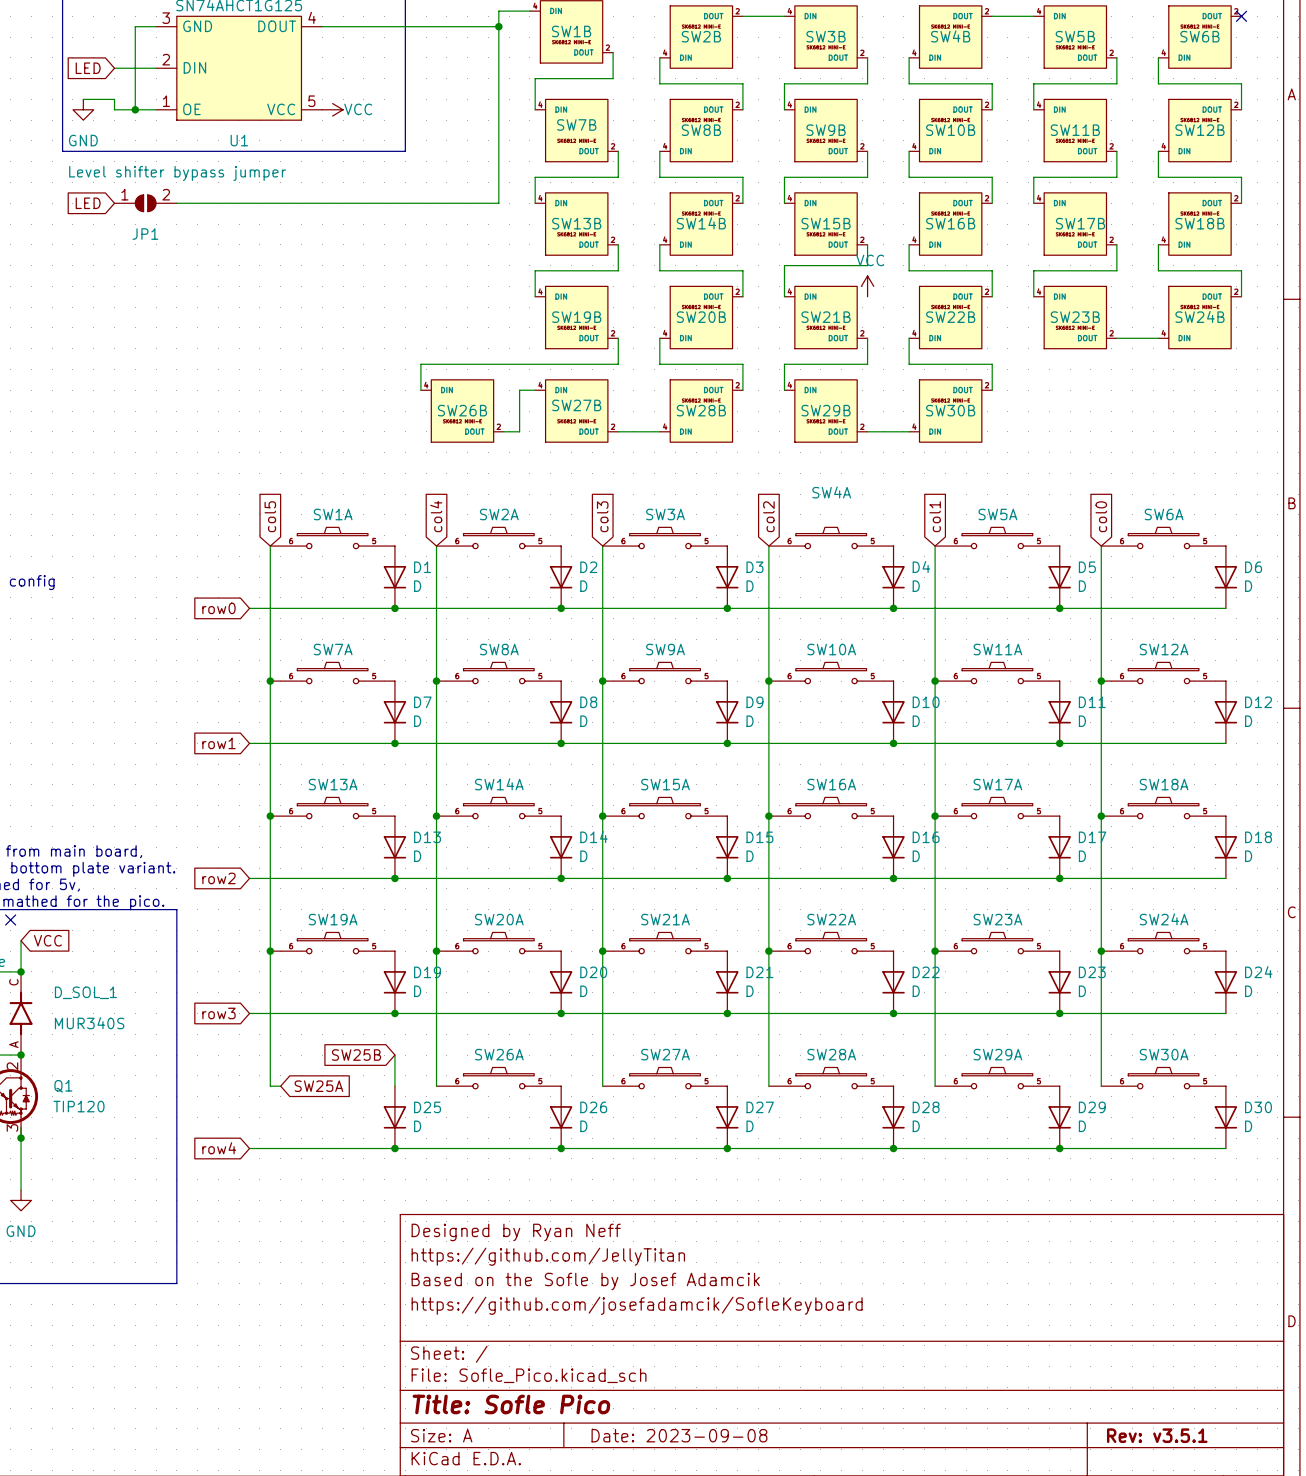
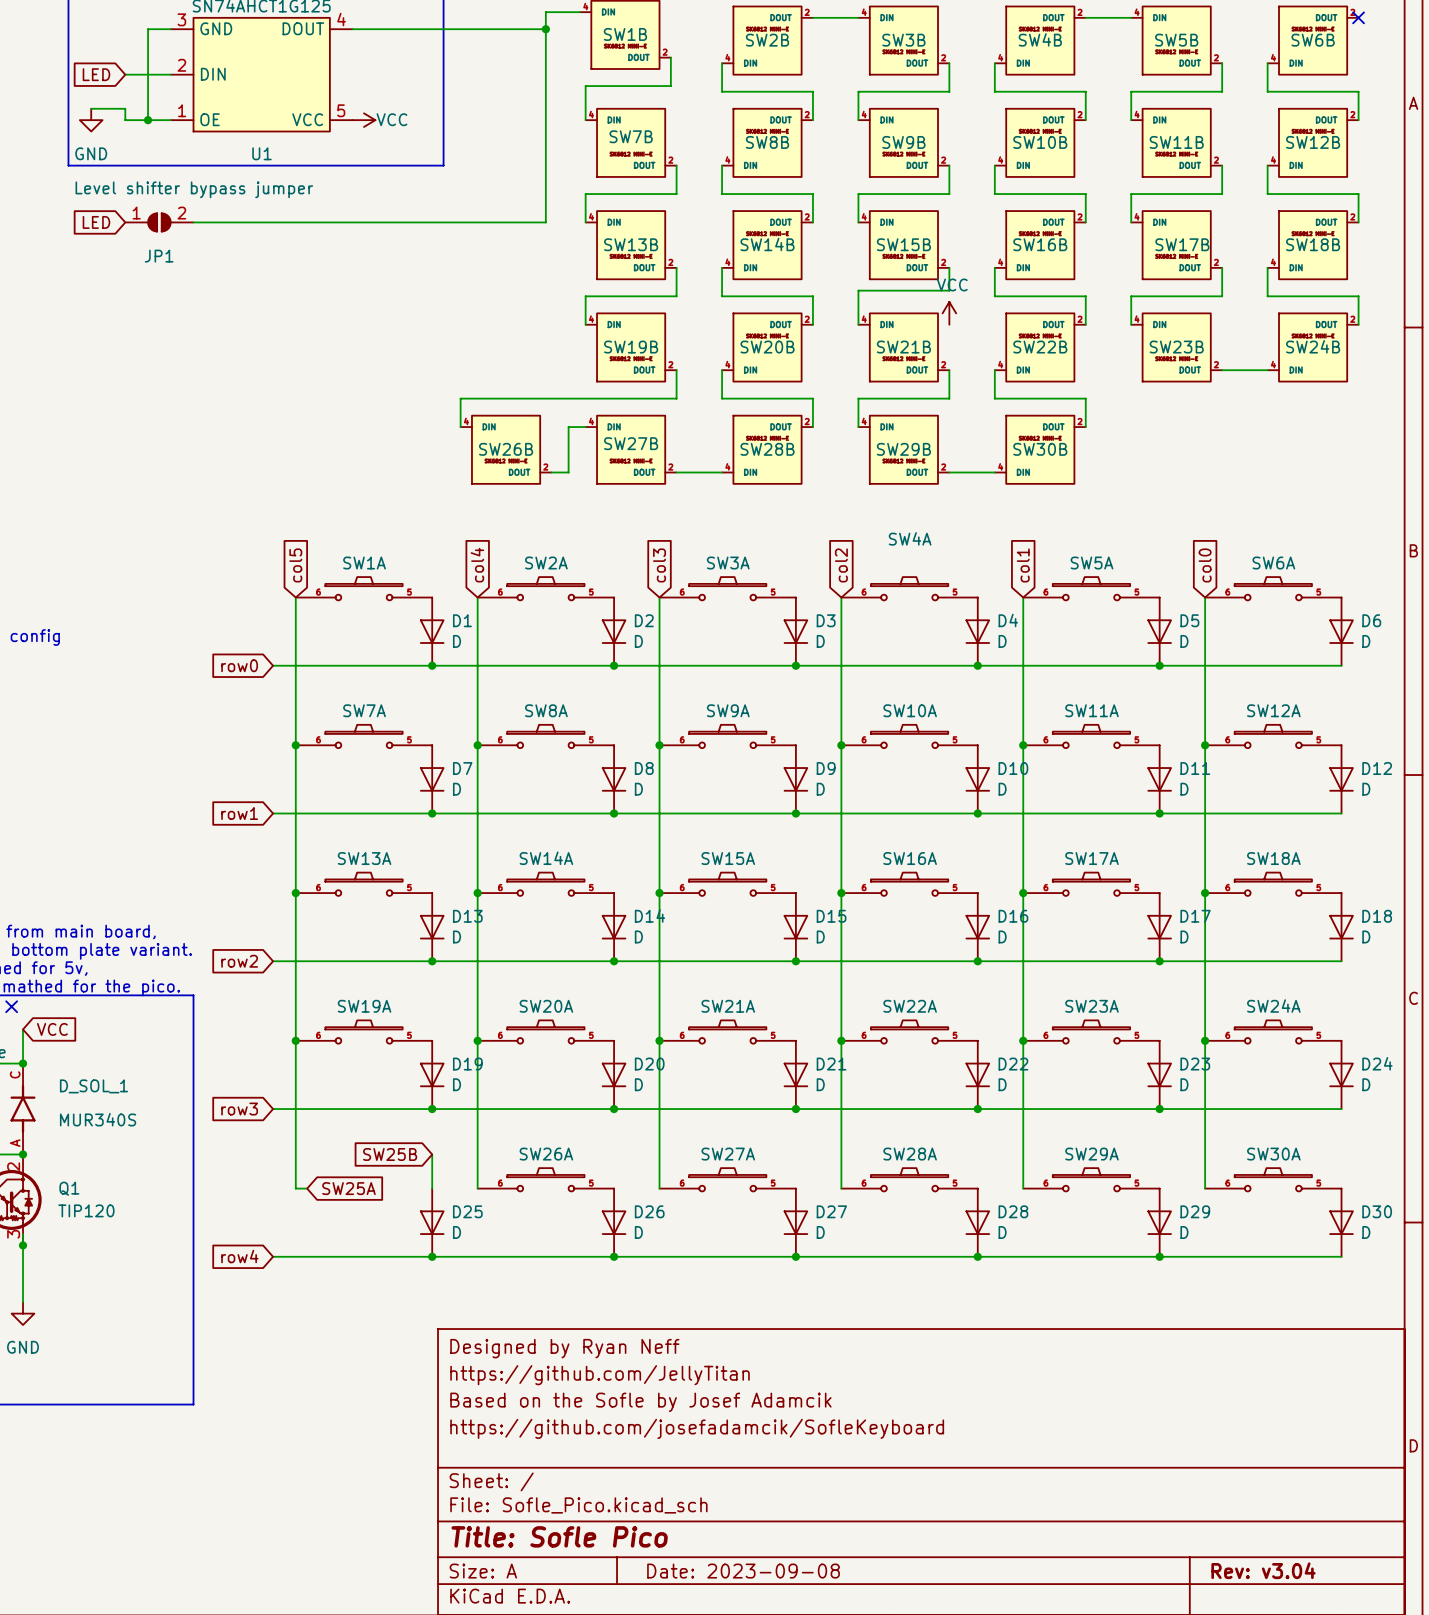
title block: Rev: v3.5.1 (1157, 1435) -> Rev: v3.04 (1263, 1570)

